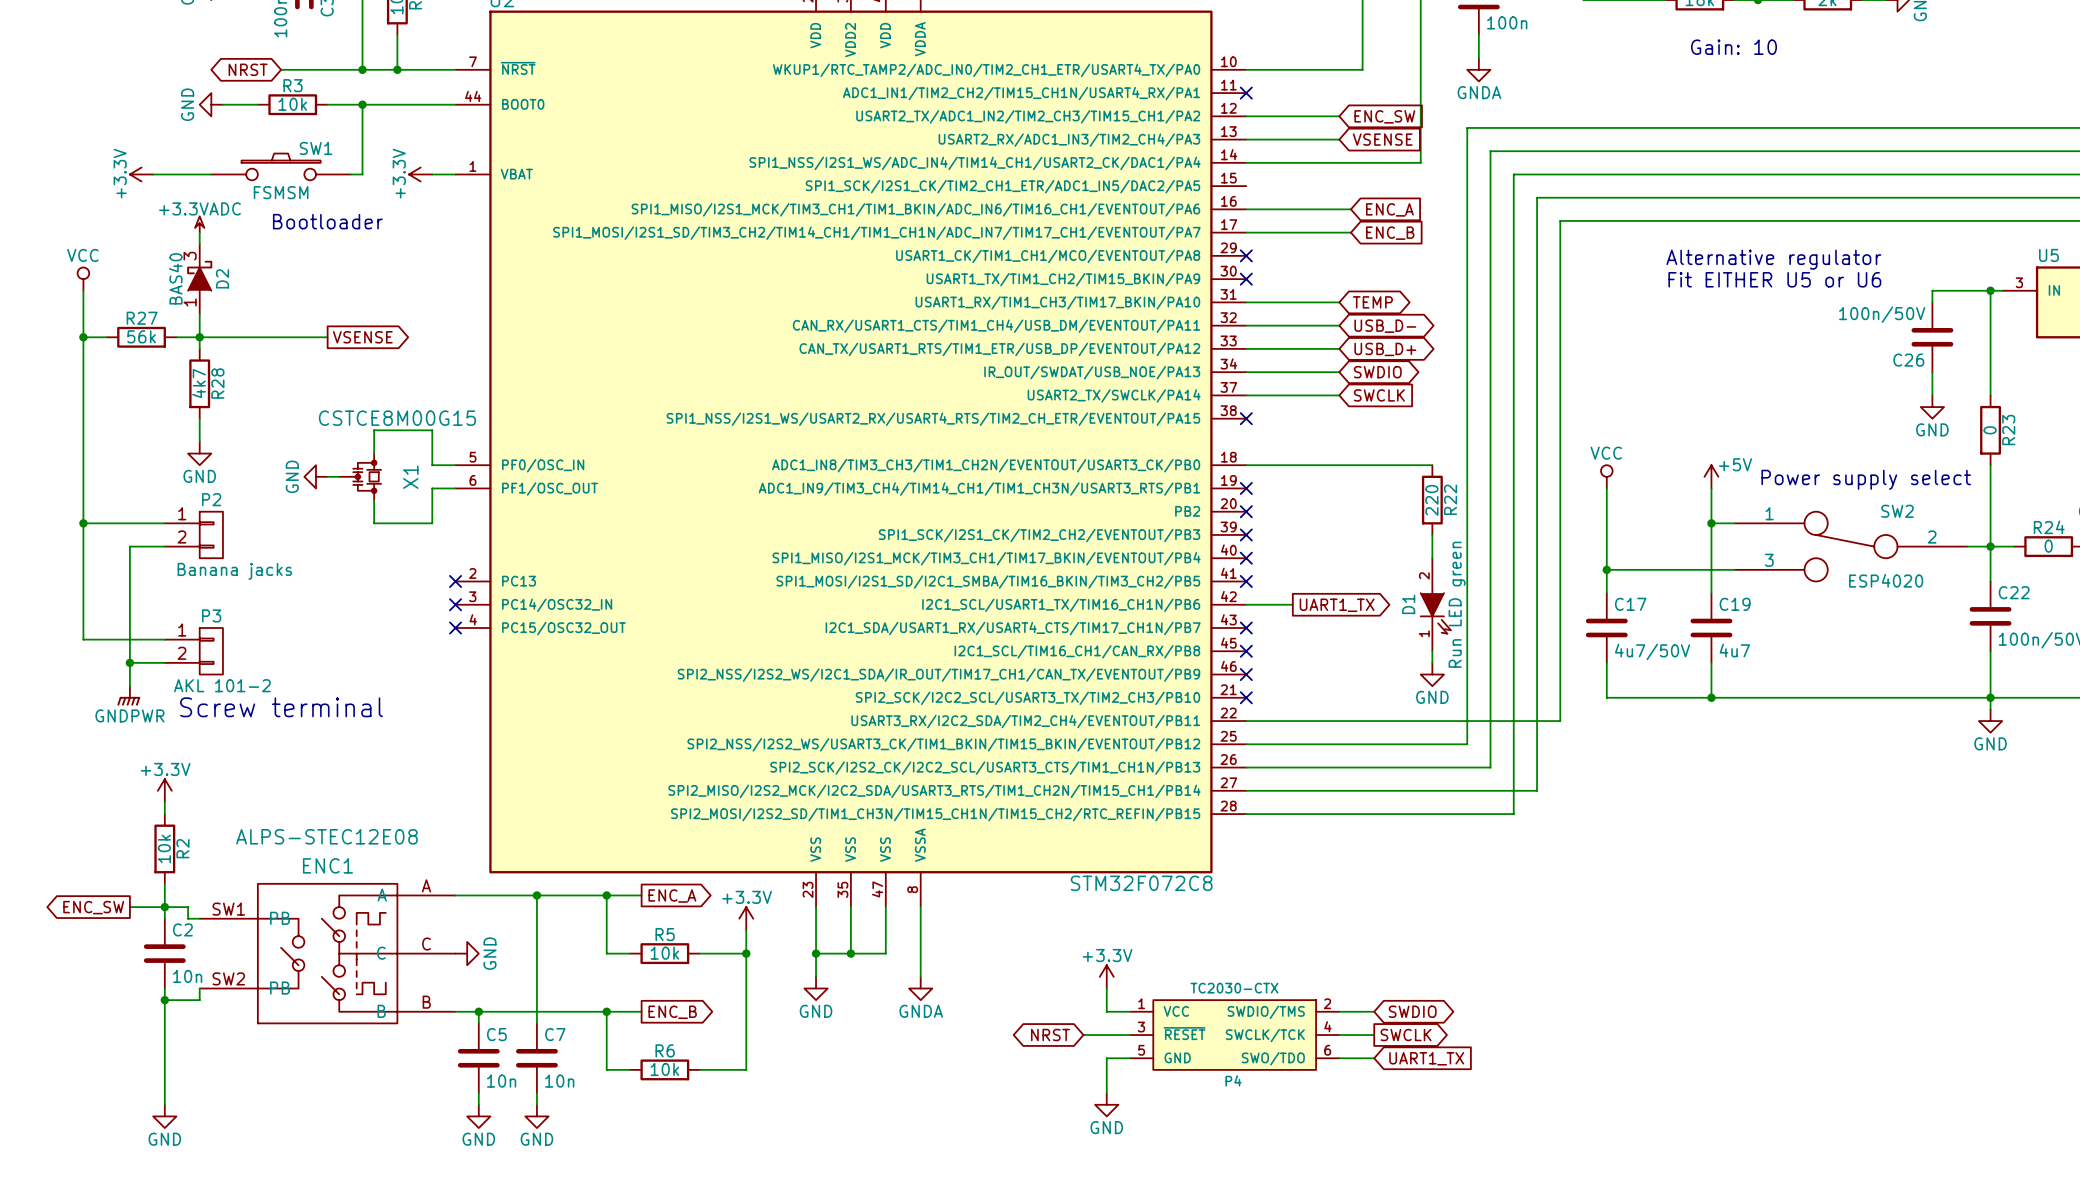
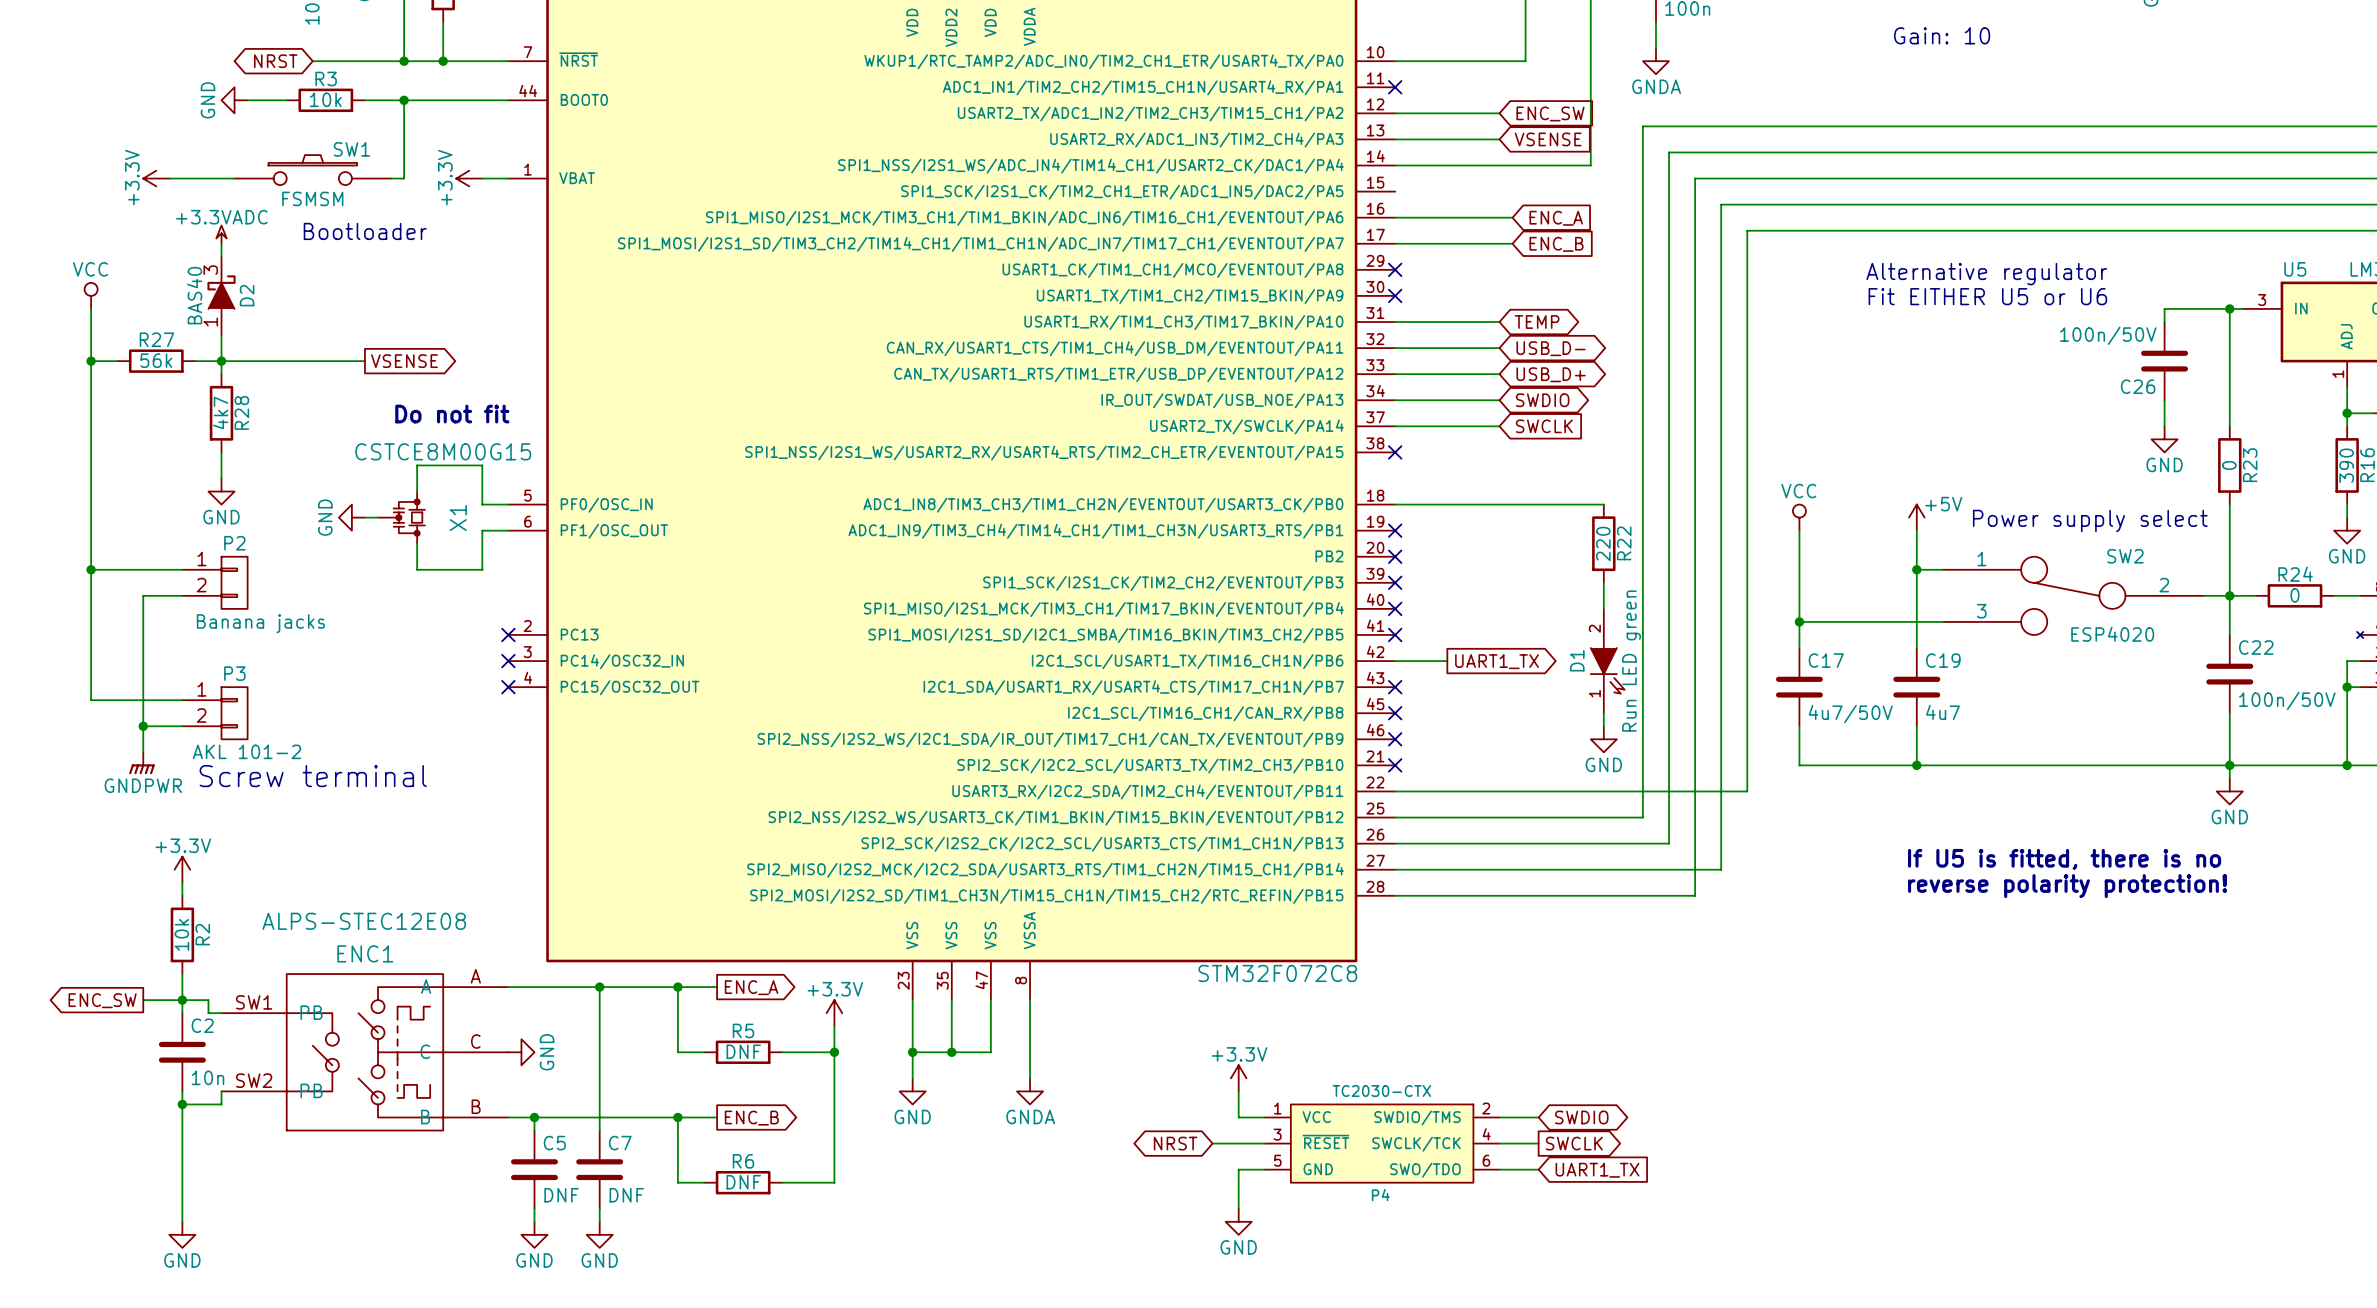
text: none -> Do not fit (452, 414)
text: none -> If U5 is fitted, there is no (2064, 859)
text: none -> reverse polarity protection! (2067, 886)
R5 value: 10k (664, 953) -> DNF (743, 1051)
R6 value: 10k (664, 1069) -> DNF (743, 1182)
C5 value: 10n (501, 1081) -> DNF (561, 1195)
C7 value: 10n (559, 1081) -> DNF (626, 1195)

